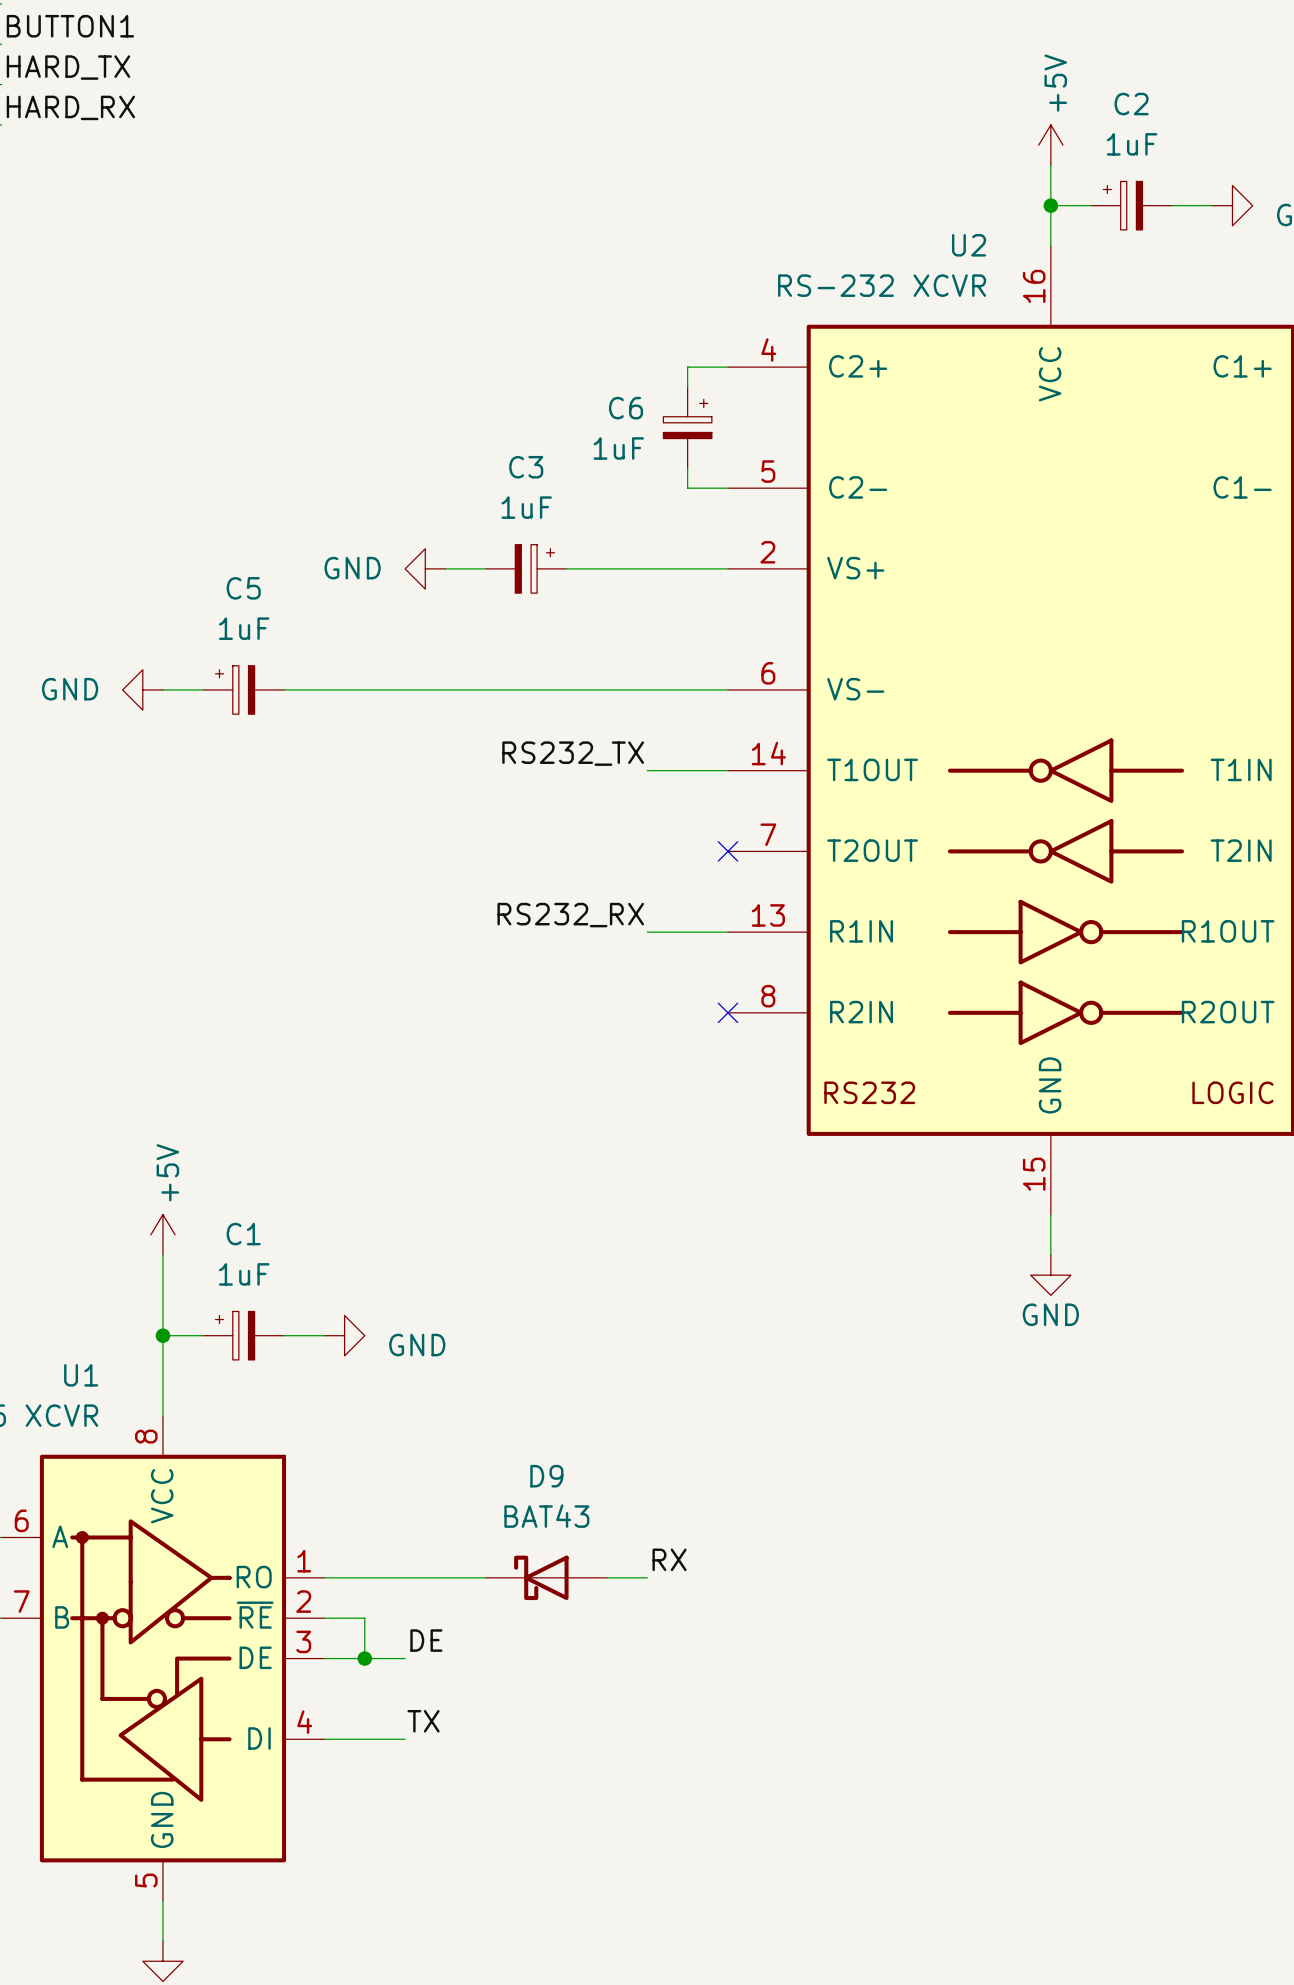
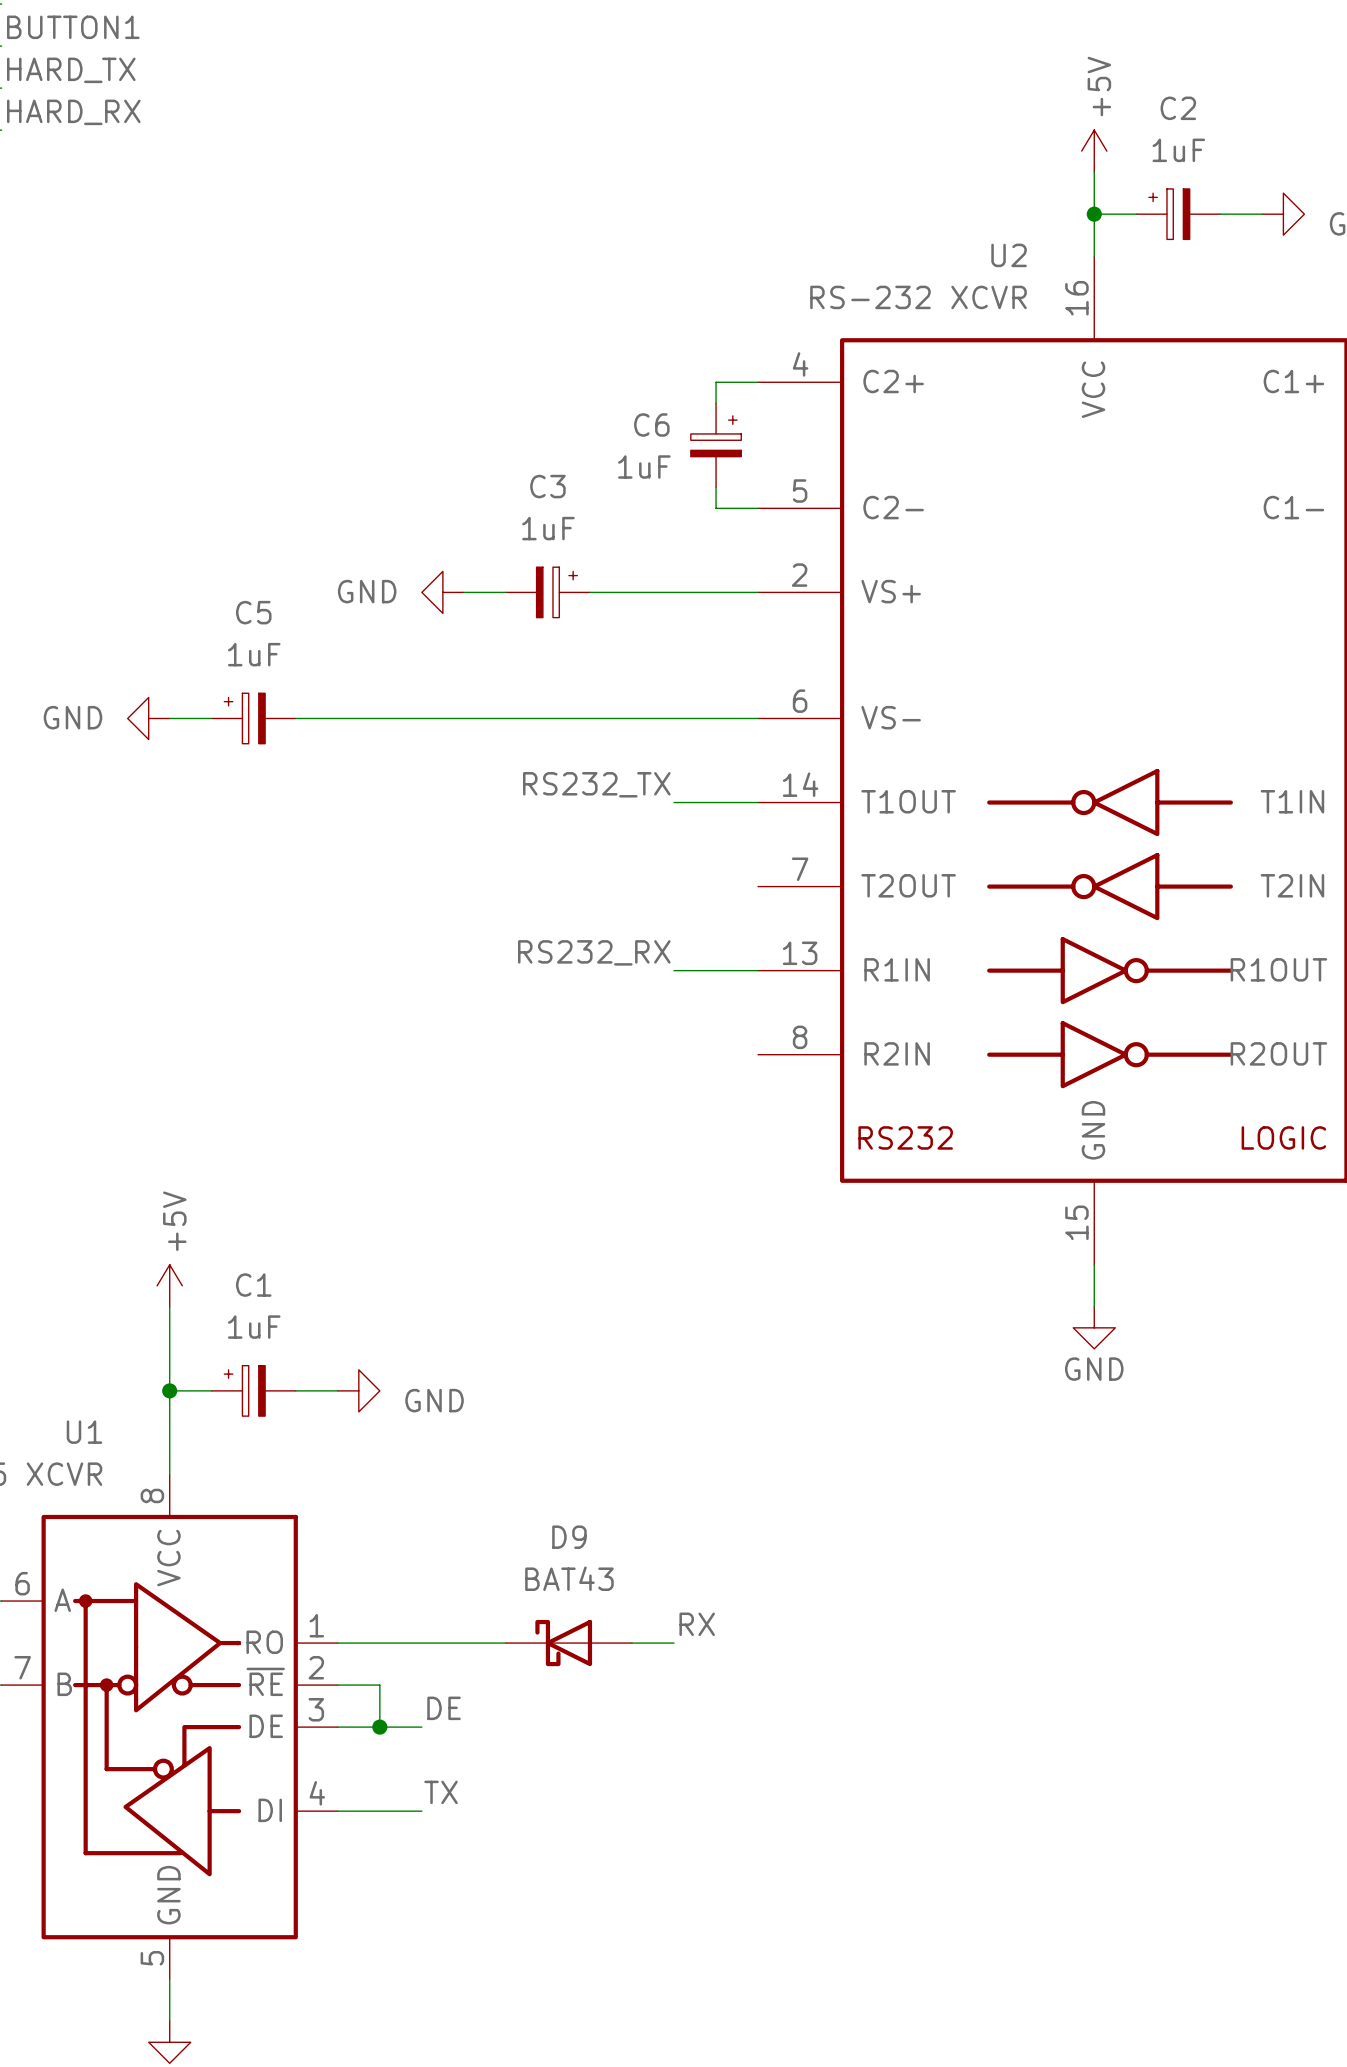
no-connect mark: (727, 851) -> none
no-connect mark: (727, 1012) -> none

